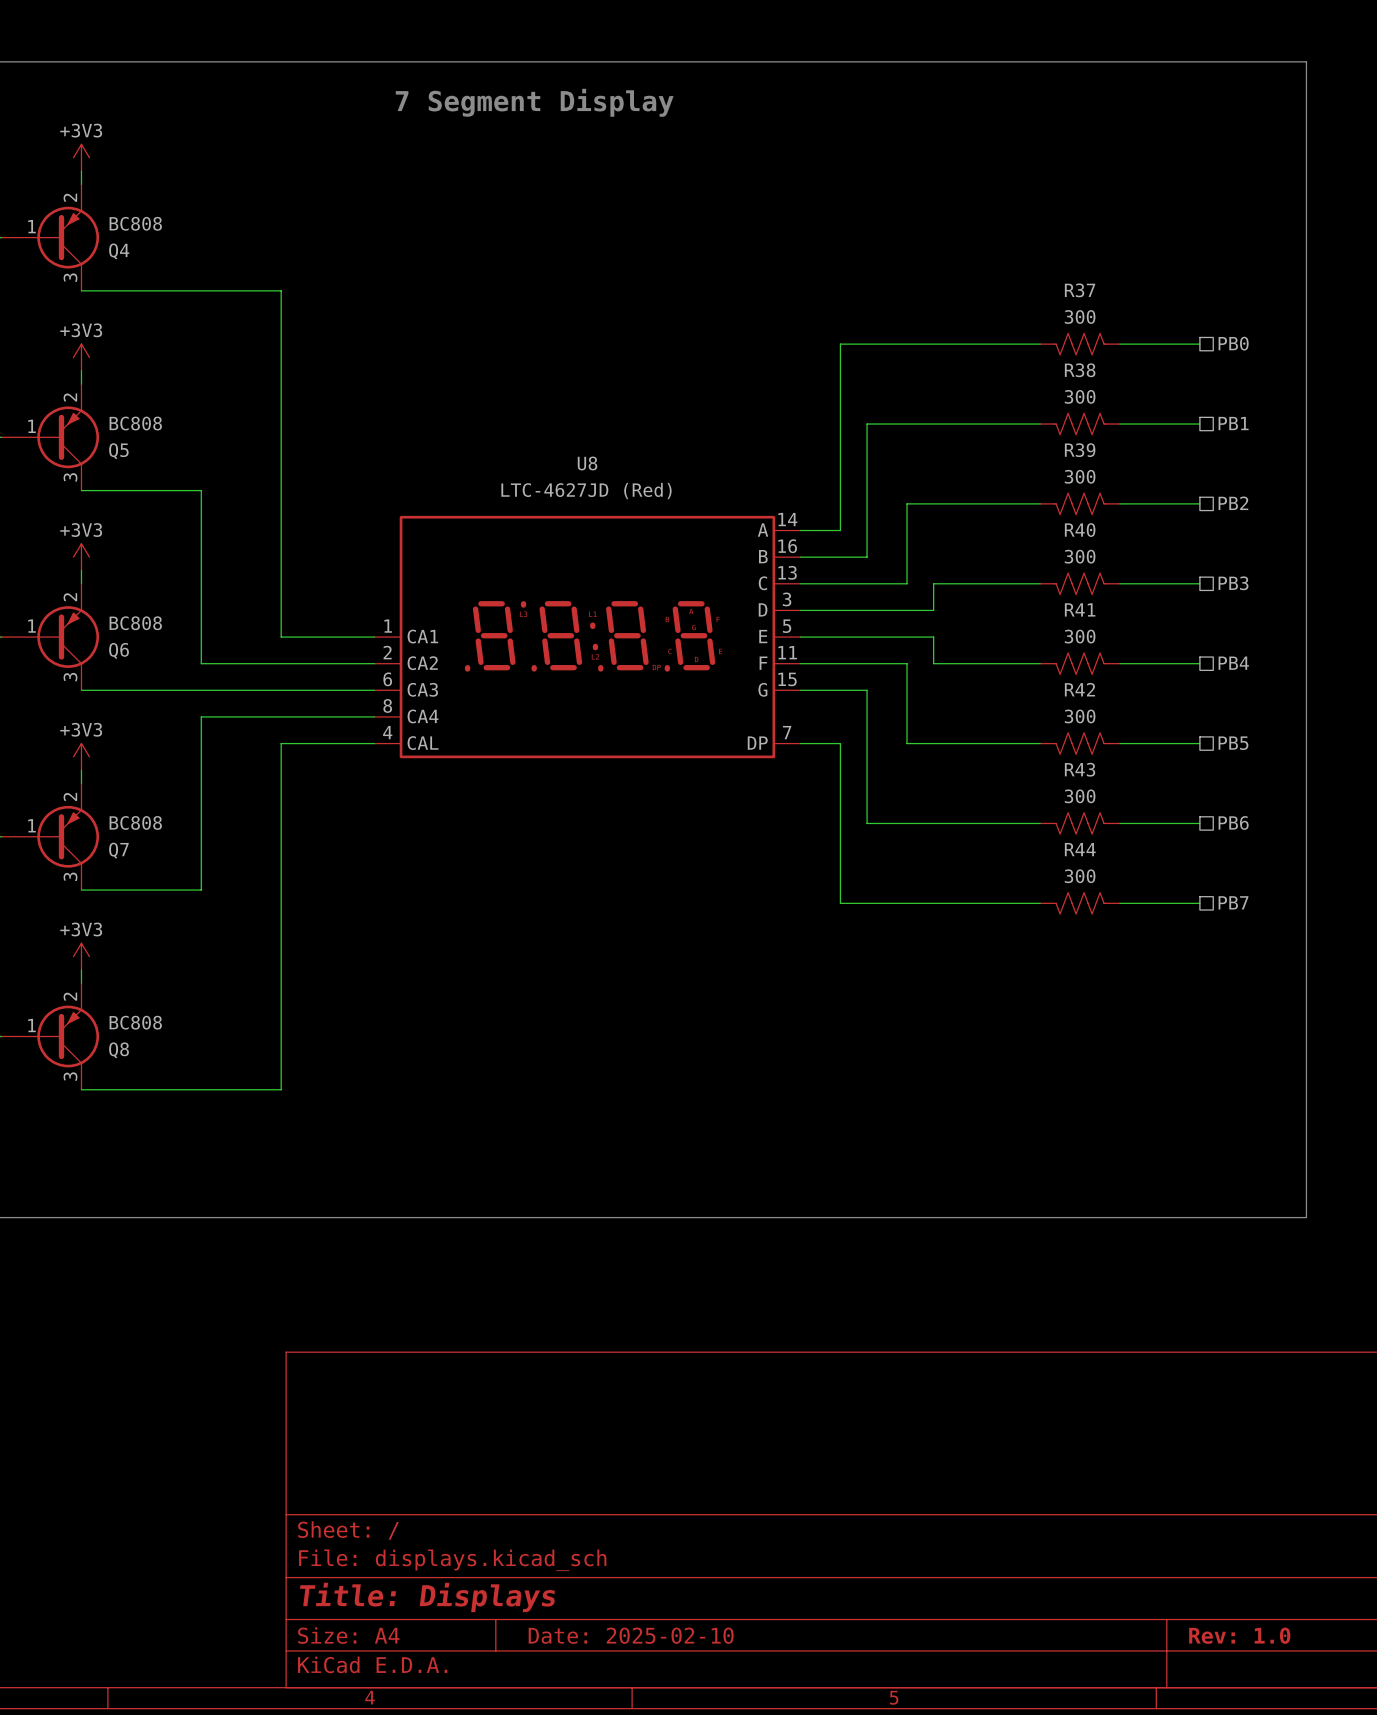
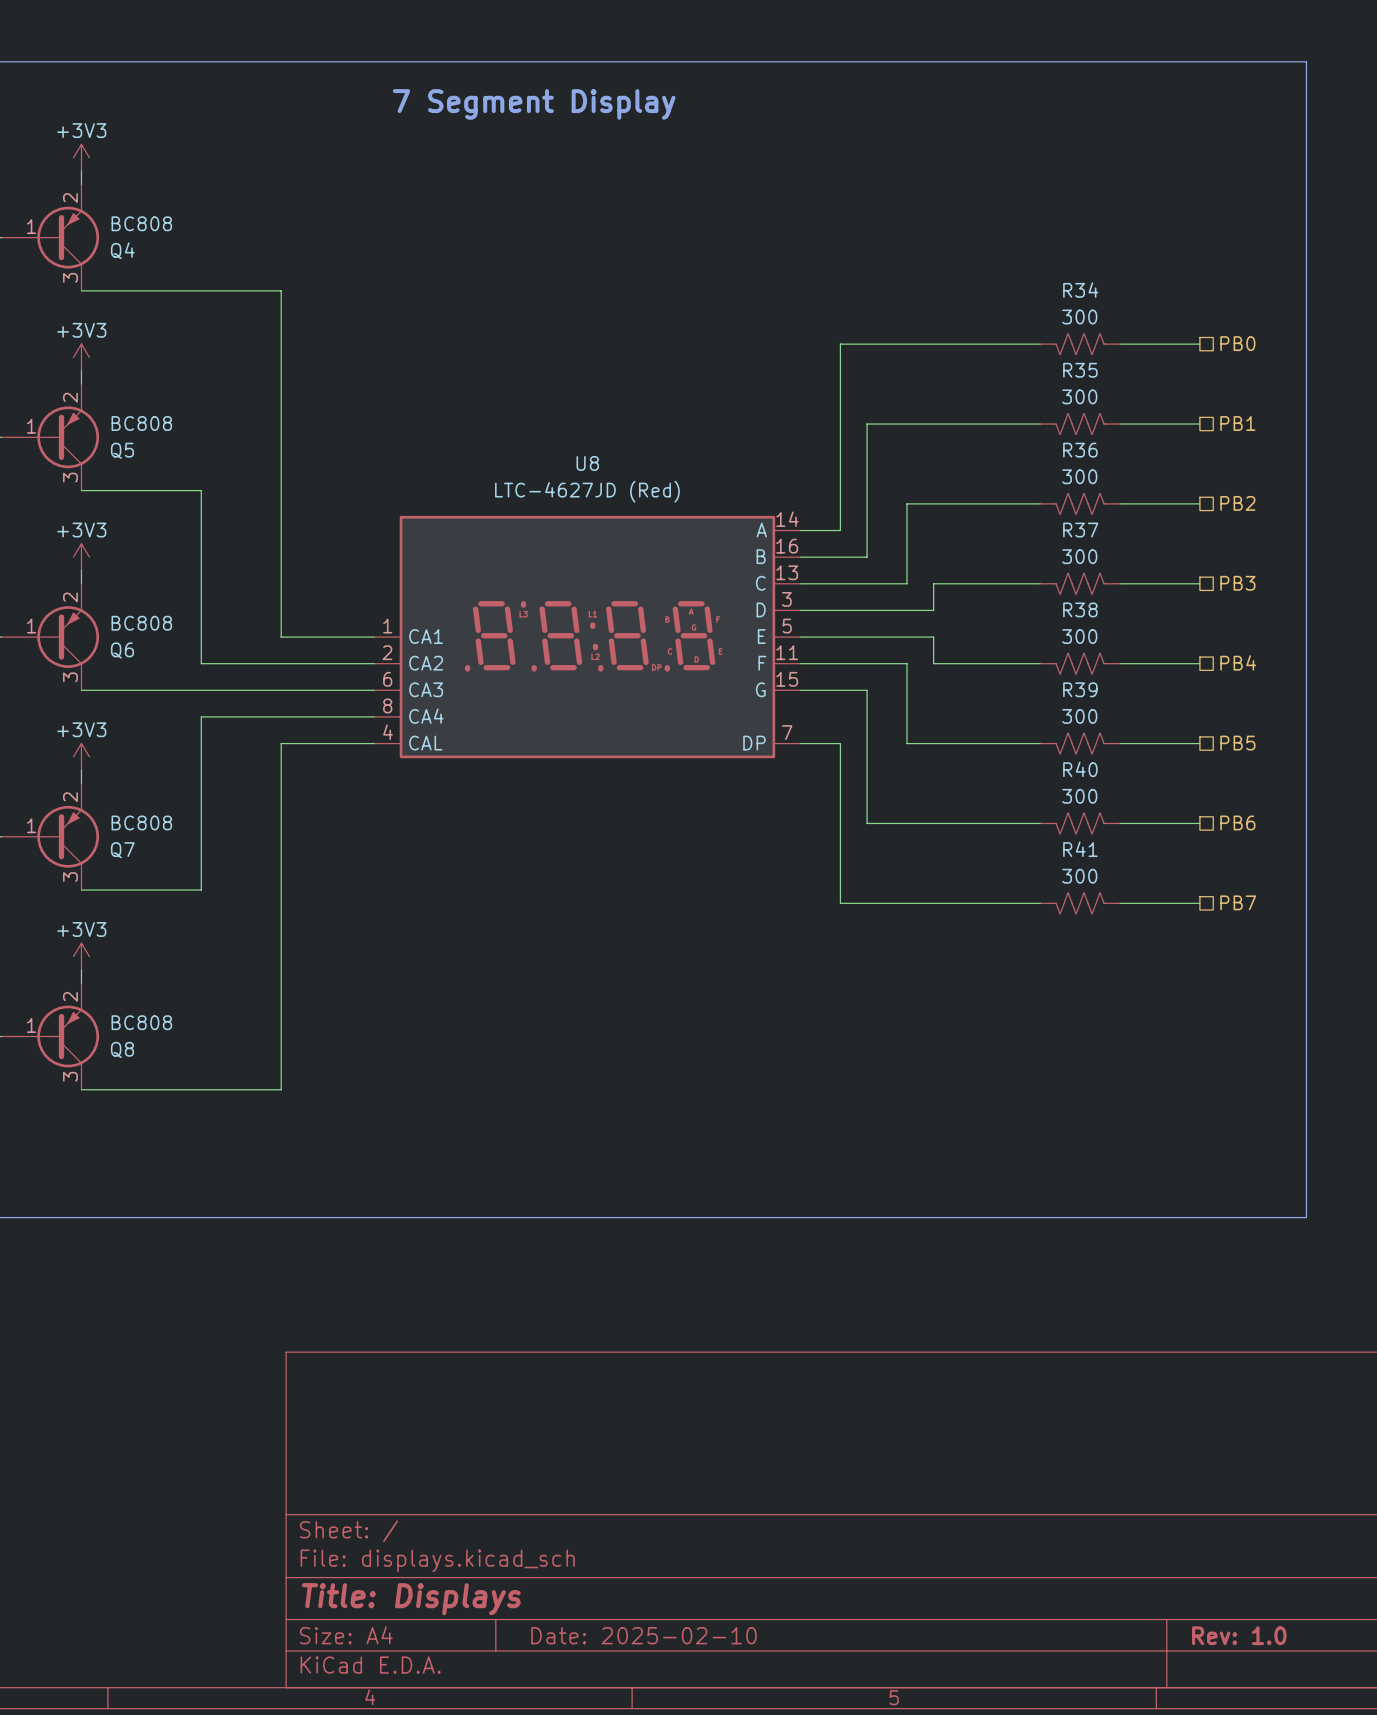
R37 name: R37 (1080, 290) -> R34 (1080, 290)
R38 name: R38 (1080, 370) -> R35 (1080, 370)
R39 name: R39 (1080, 450) -> R36 (1080, 450)
R40 name: R40 (1080, 530) -> R37 (1080, 530)
R41 name: R41 (1080, 609) -> R38 (1080, 609)
R42 name: R42 (1079, 689) -> R39 (1080, 689)
R43 name: R43 (1080, 769) -> R40 (1080, 769)
R44 name: R44 (1080, 849) -> R41 (1080, 849)

